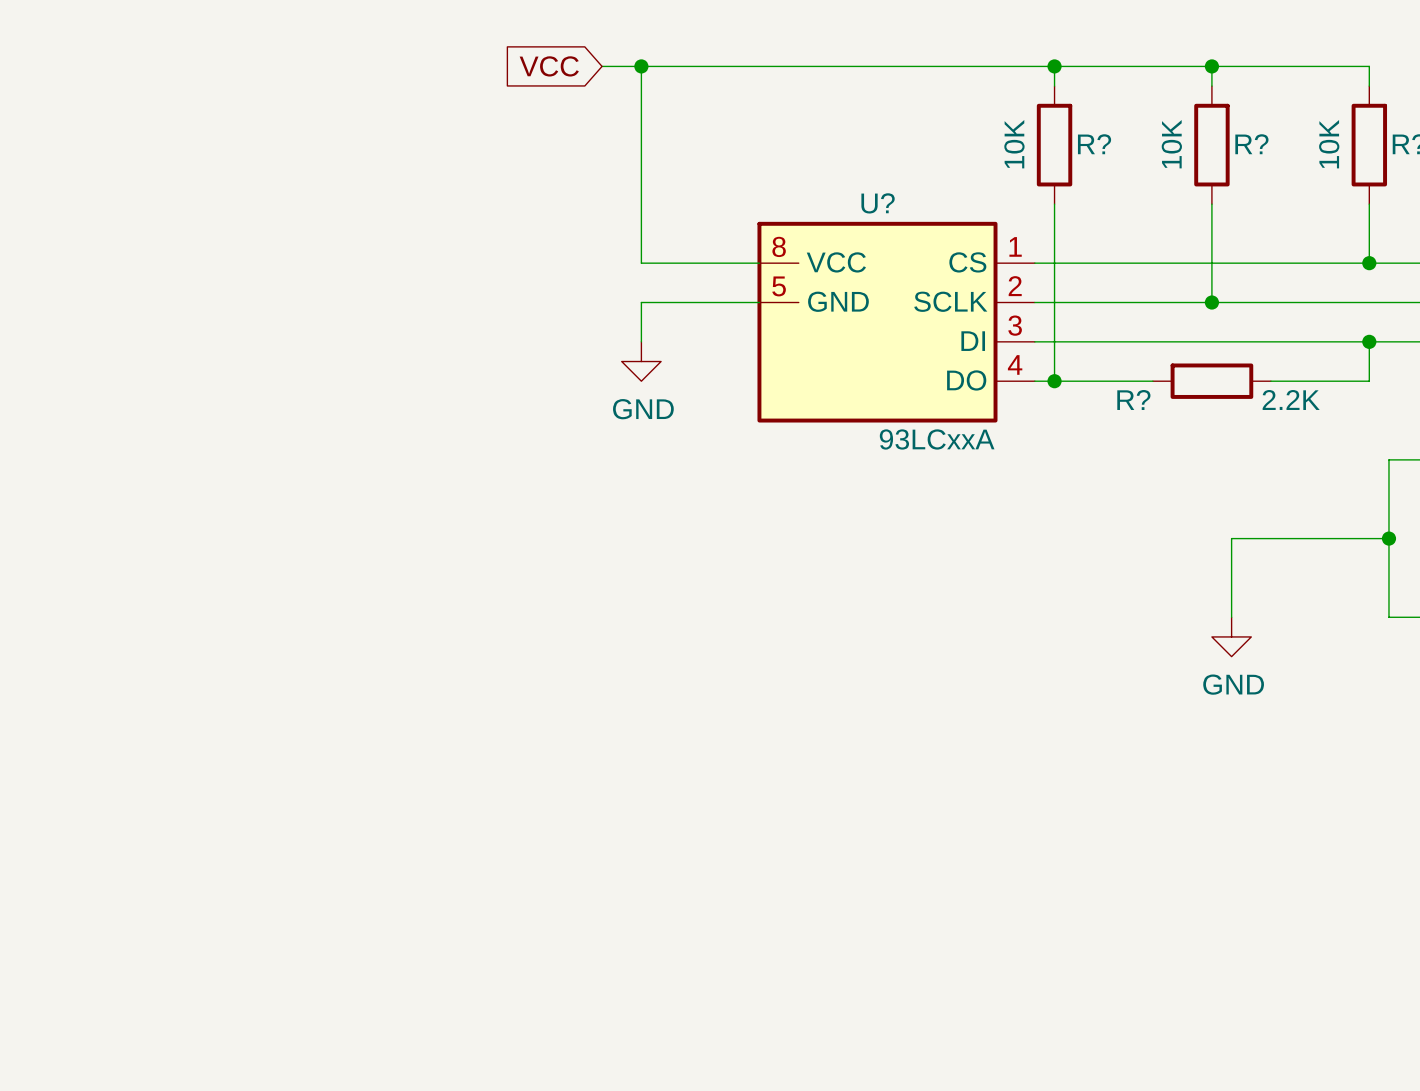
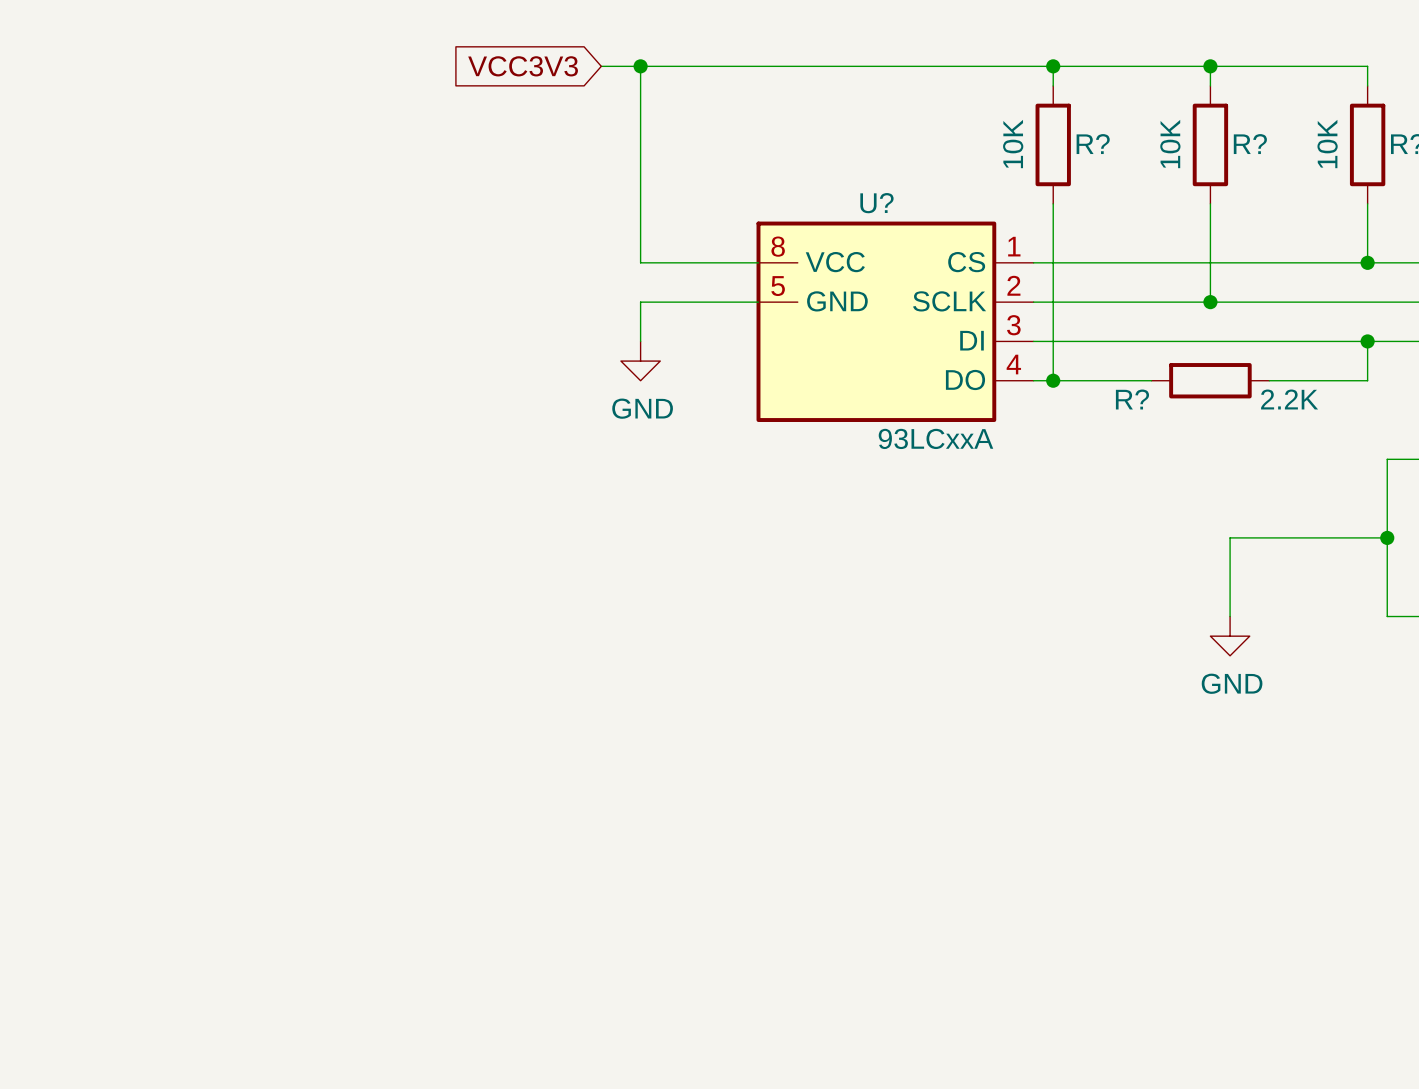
global label: VCC (549, 66) -> VCC3V3 (523, 66)

